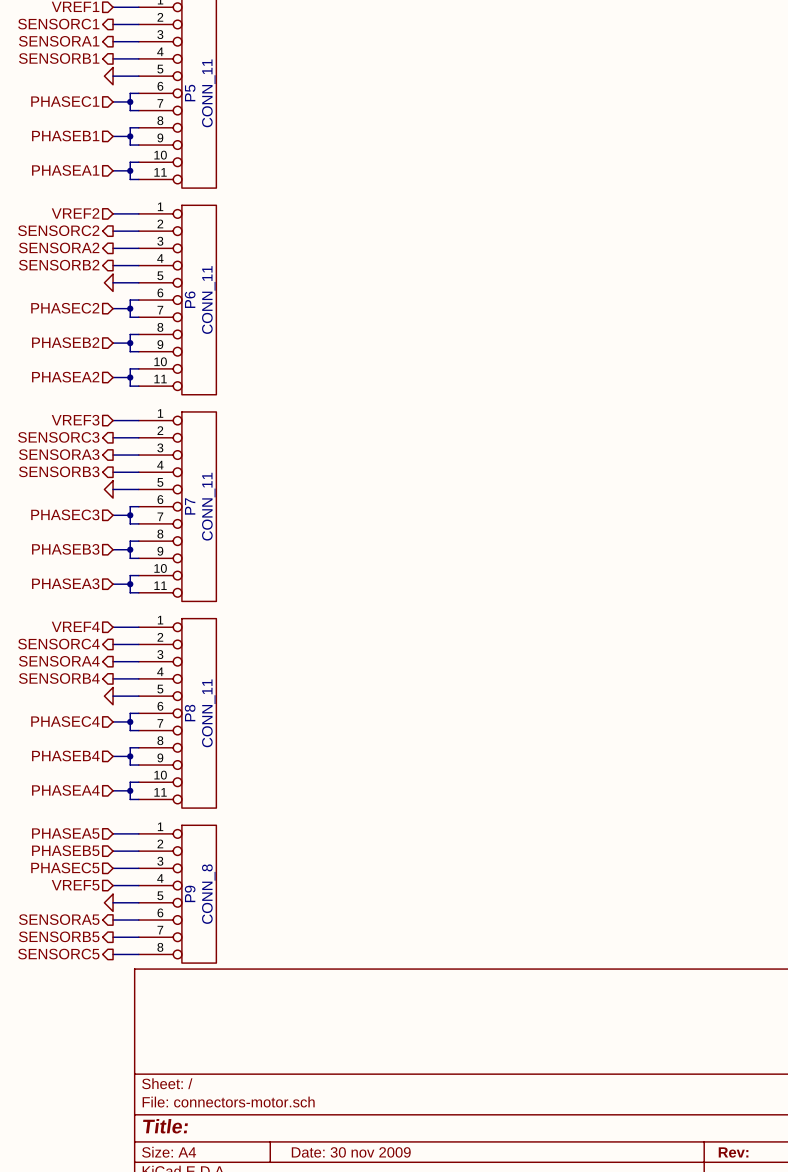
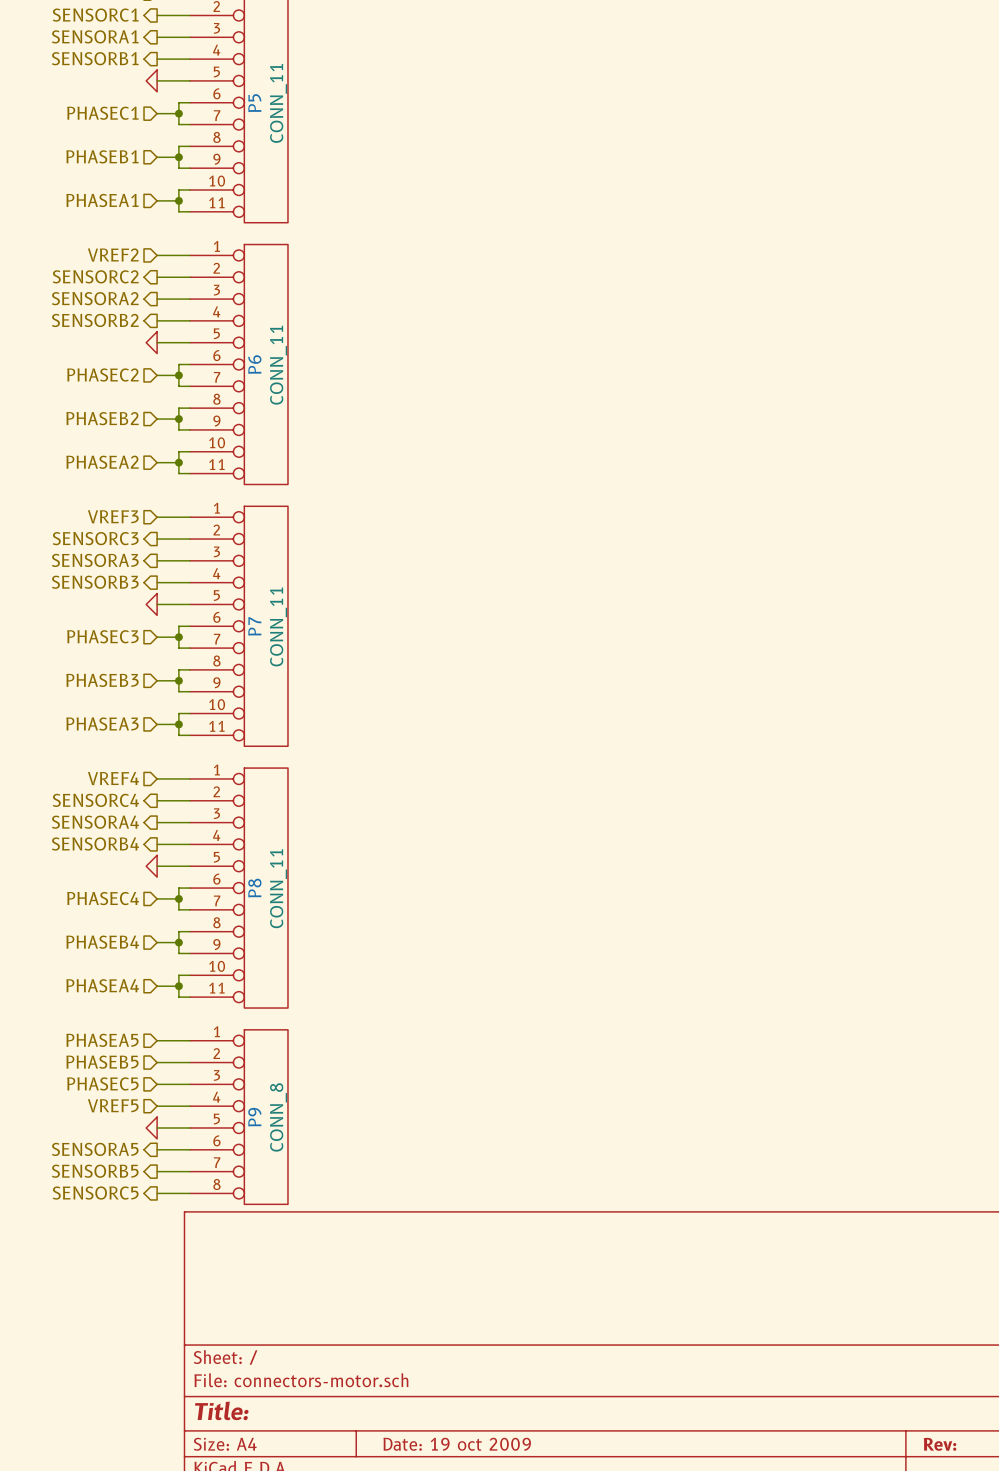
title block: Date: 30 nov 2009 (351, 1152) -> Date: 19 oct 2009 (457, 1444)

